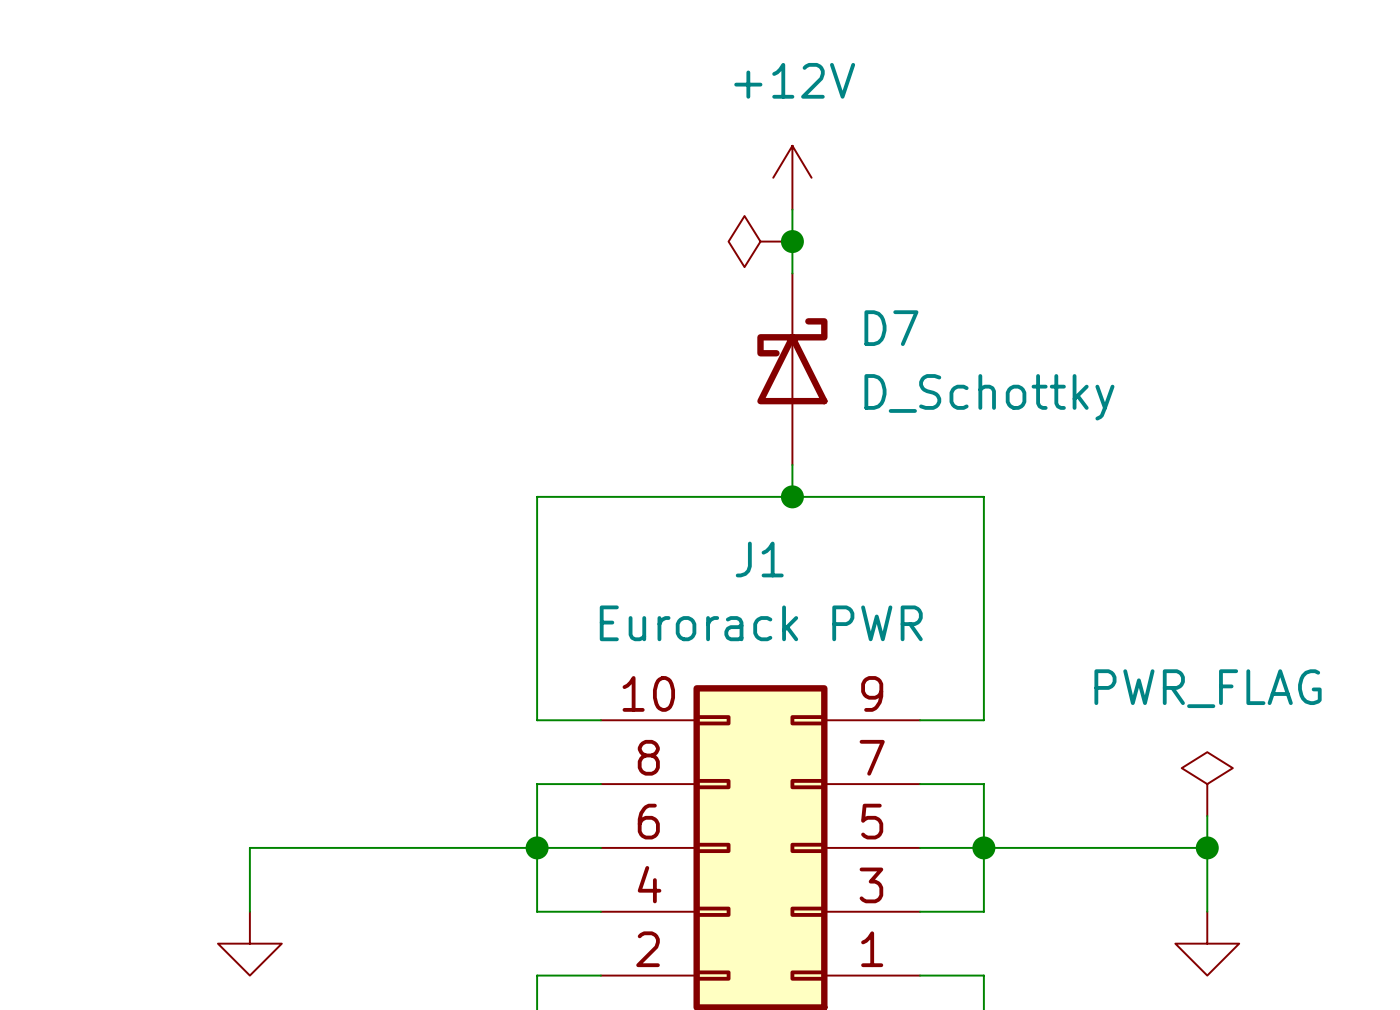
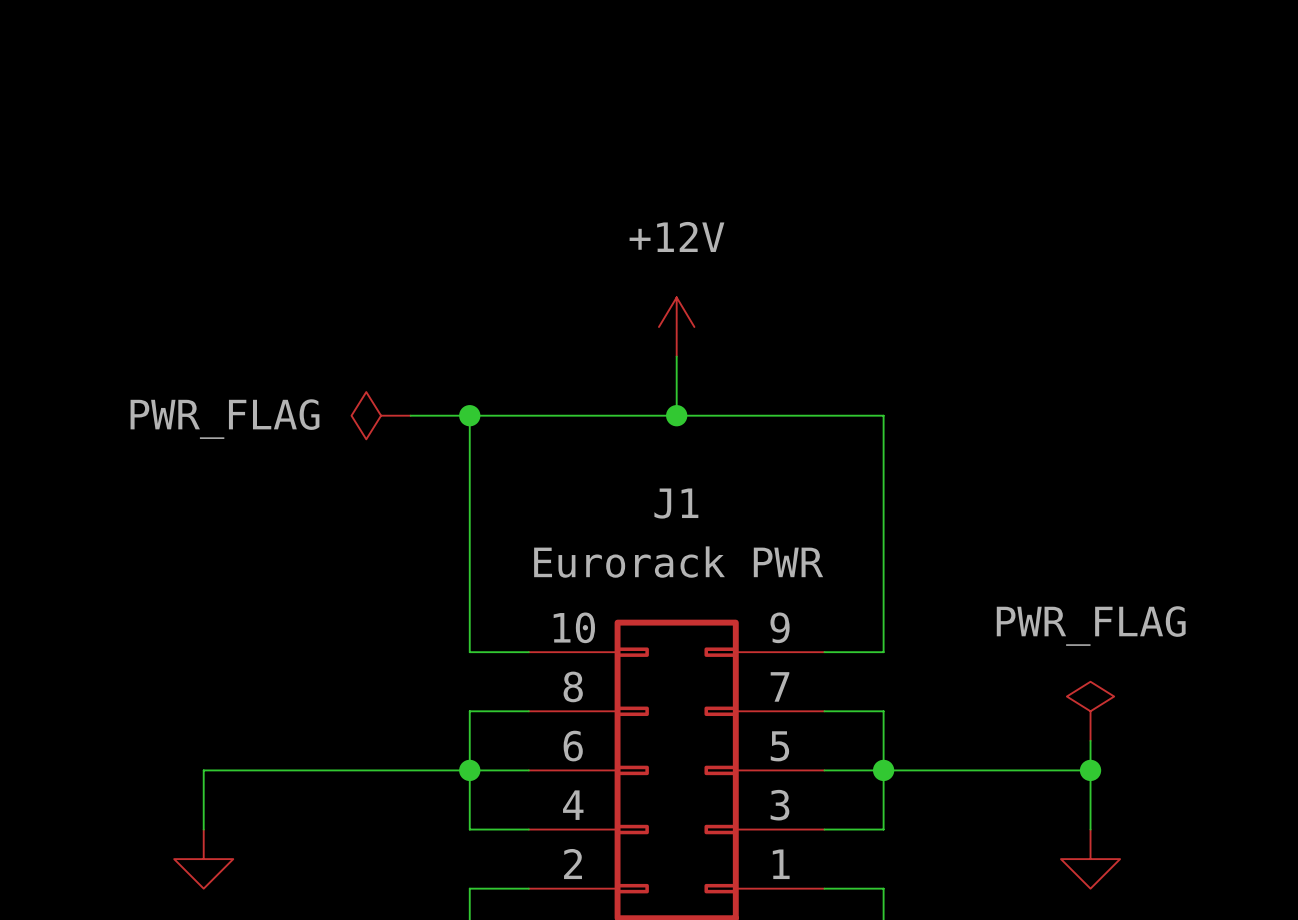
power symbol position: +12V (792, 177) -> +12V (676, 327)
wire: (792, 209) (792, 273) -> (676, 356) (676, 415)
power symbol: (760, 241) -> none
junction: (792, 241) -> none
D7: D_Schottky (792, 369) -> none
power symbol: none -> PWR_FLAG (381, 415)
junction: none -> (469, 415)
wire: (792, 464) (792, 496) -> (469, 415) (469, 445)
wire: (537, 496) (983, 496) -> (410, 415) (883, 415) (883, 445)
junction position: (792, 496) -> (676, 415)

